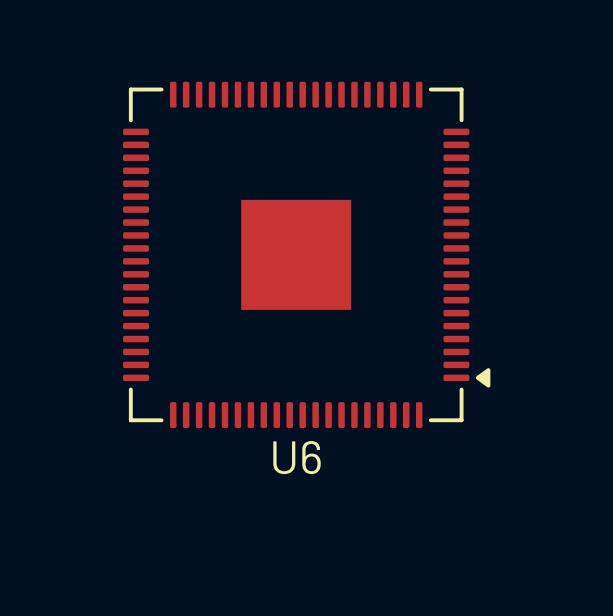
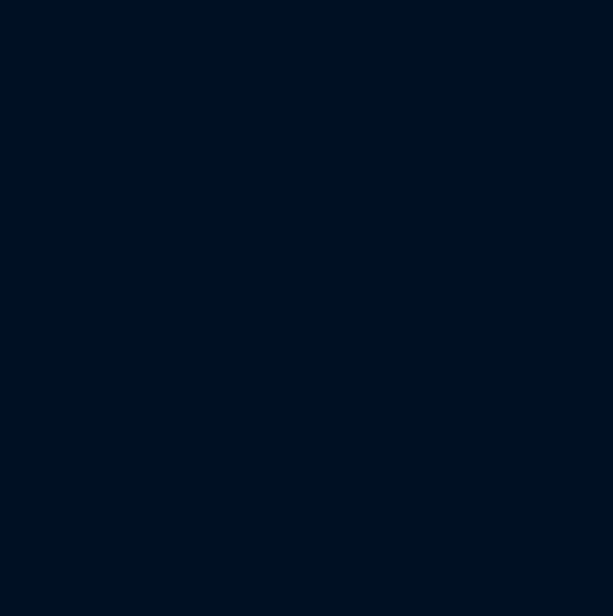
U6: (306, 254) -> none

